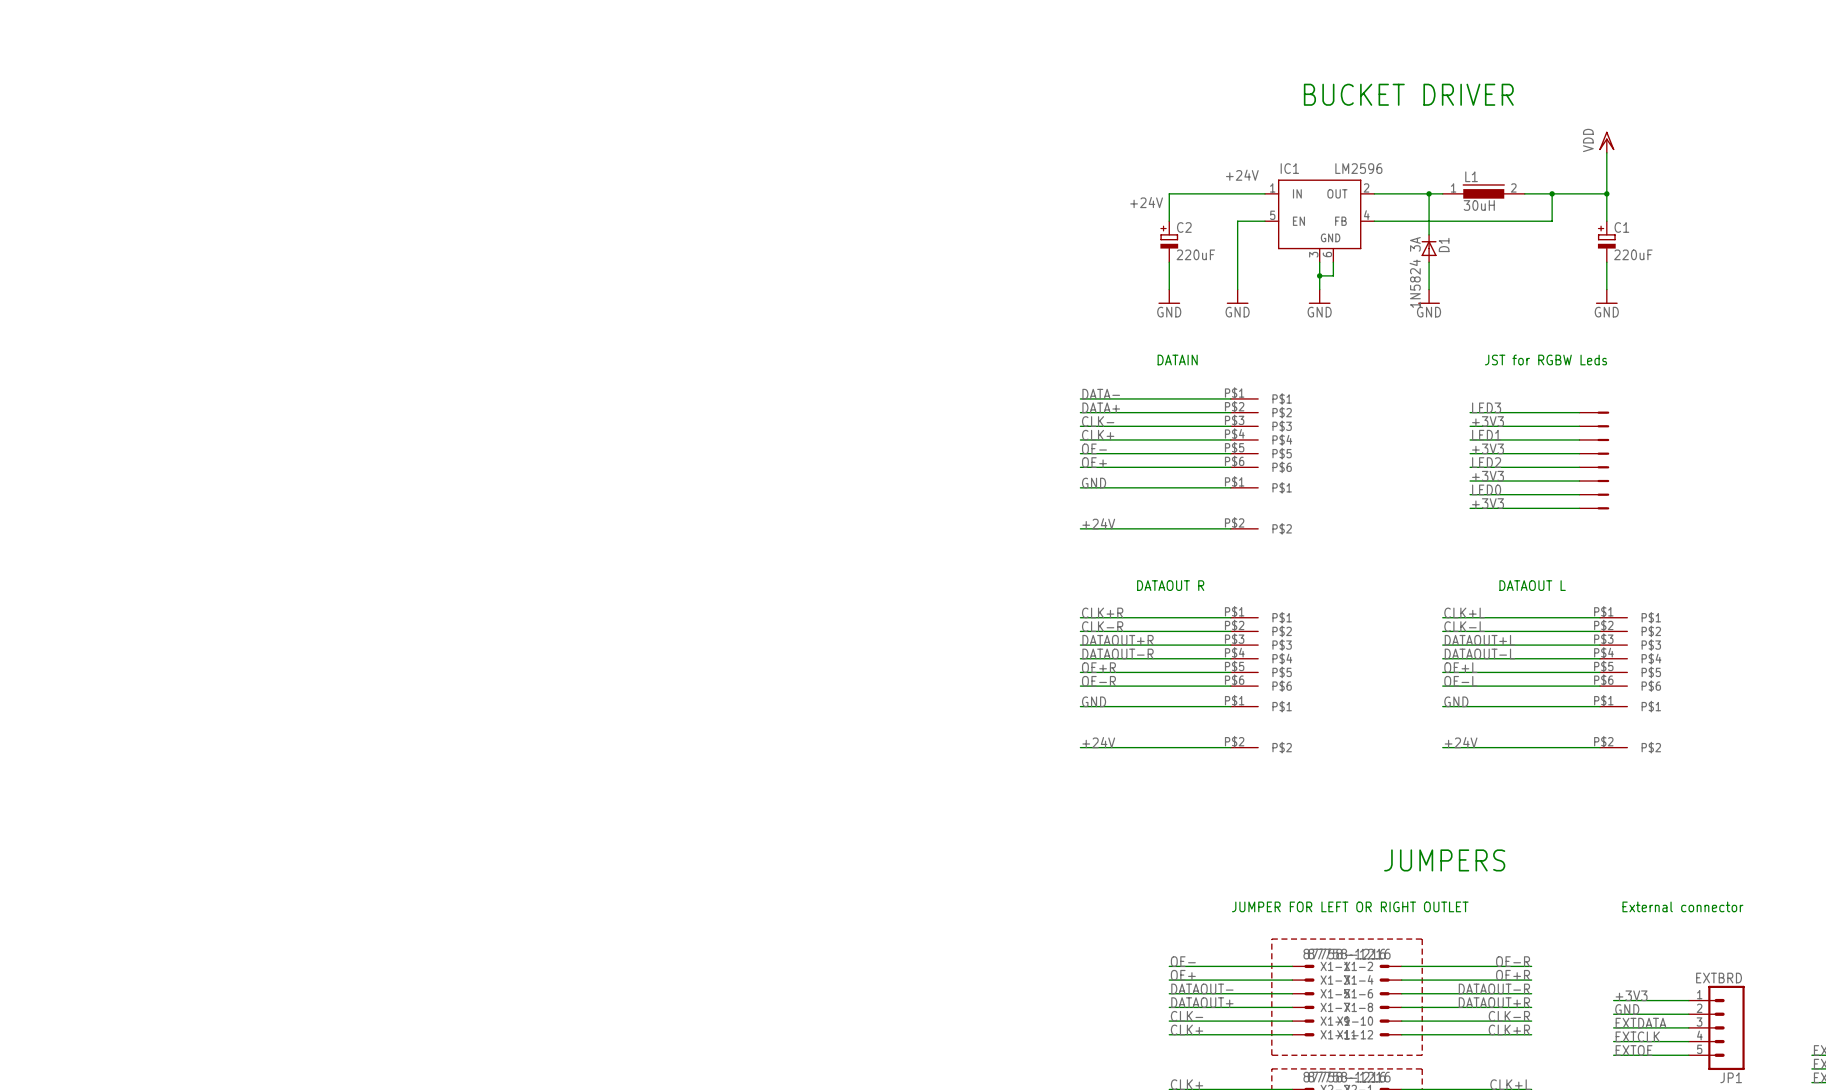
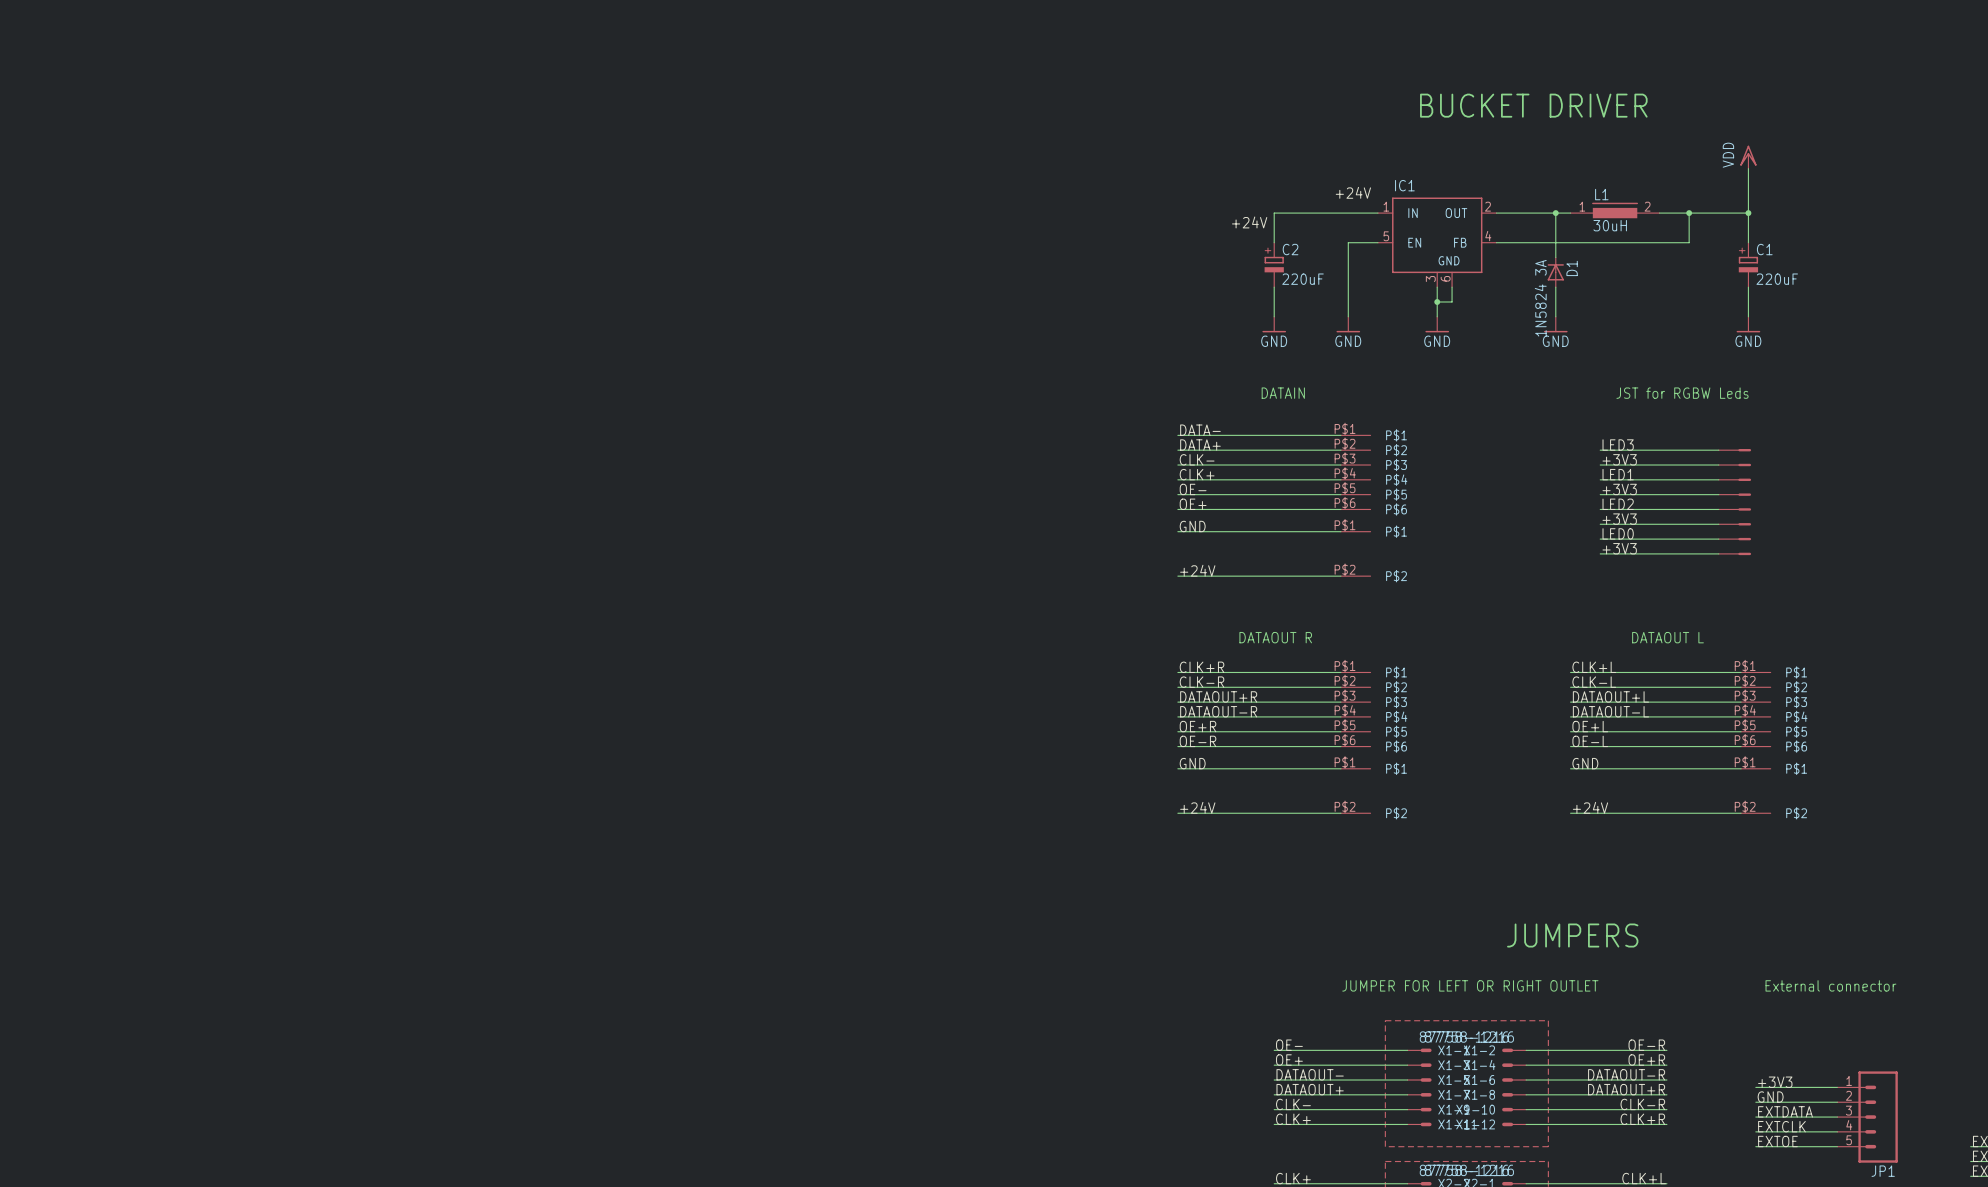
IC1 value: LM2596 (1358, 168) -> none
JP1 value: EXTBRD (1719, 978) -> none

